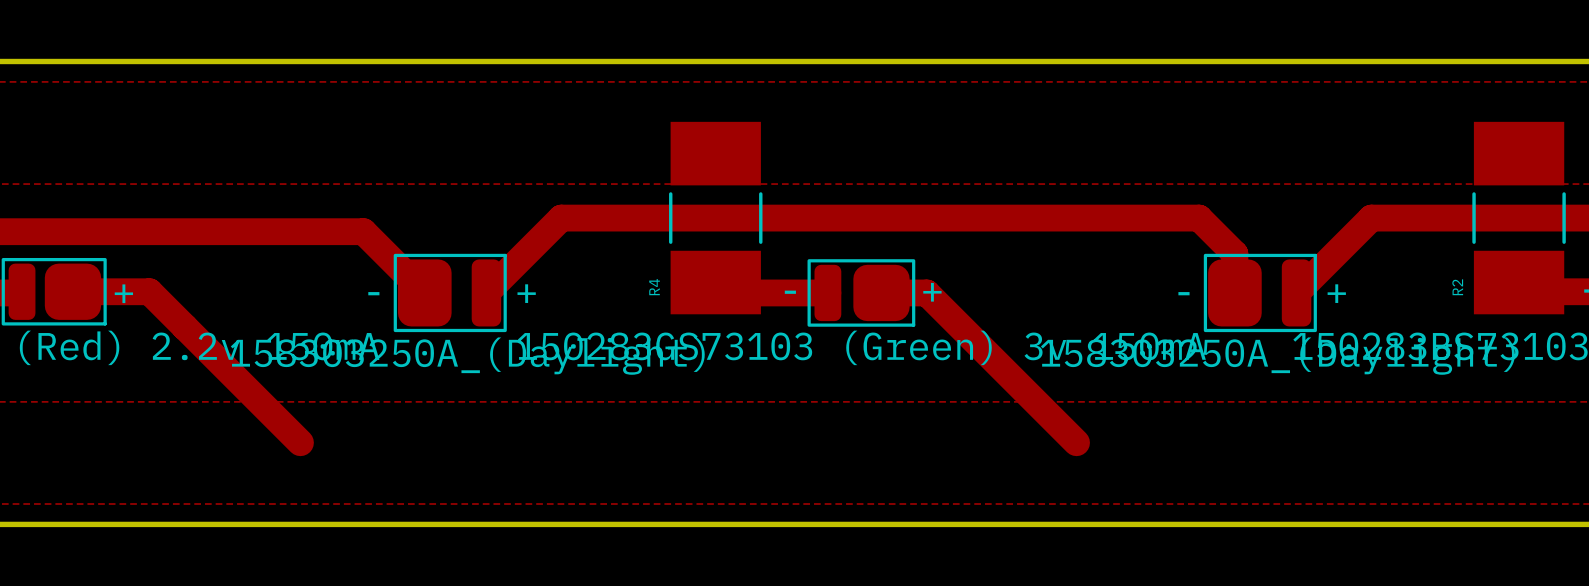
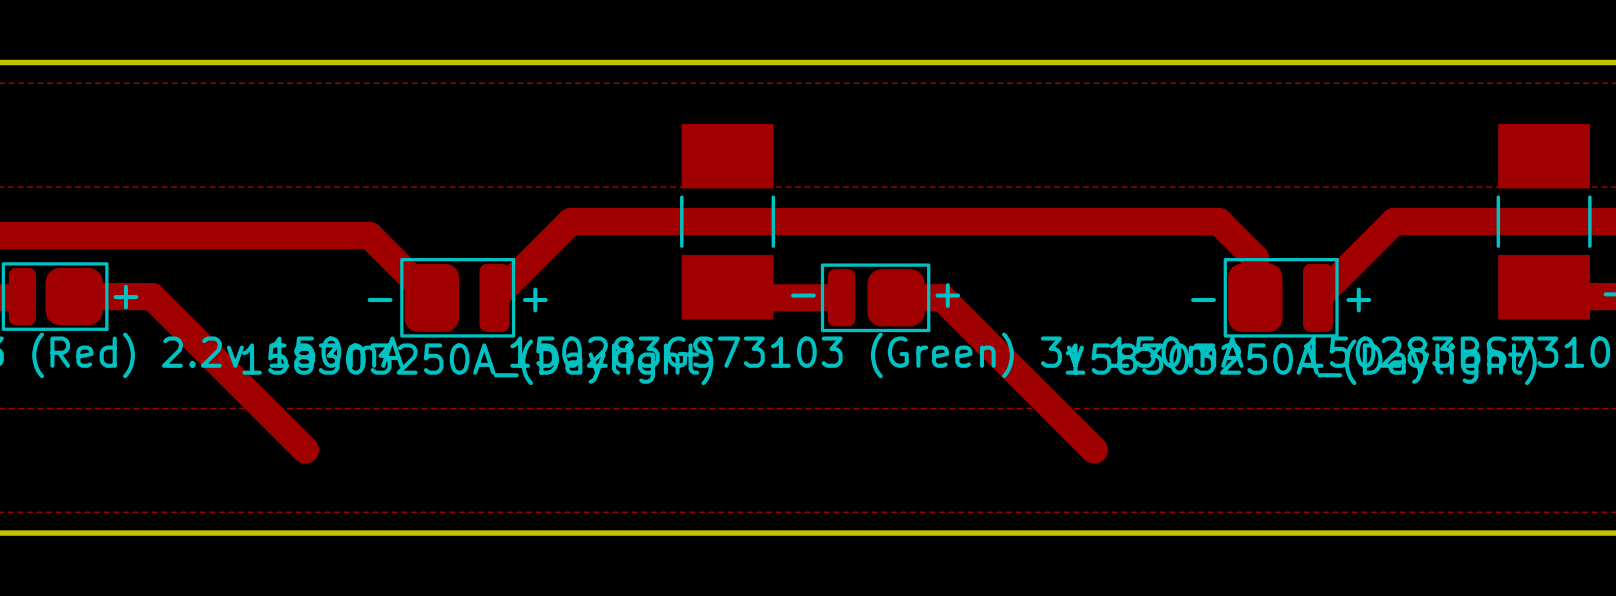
R4 name: R4 (654, 287) -> none
R2 name: R2 (1457, 287) -> none

